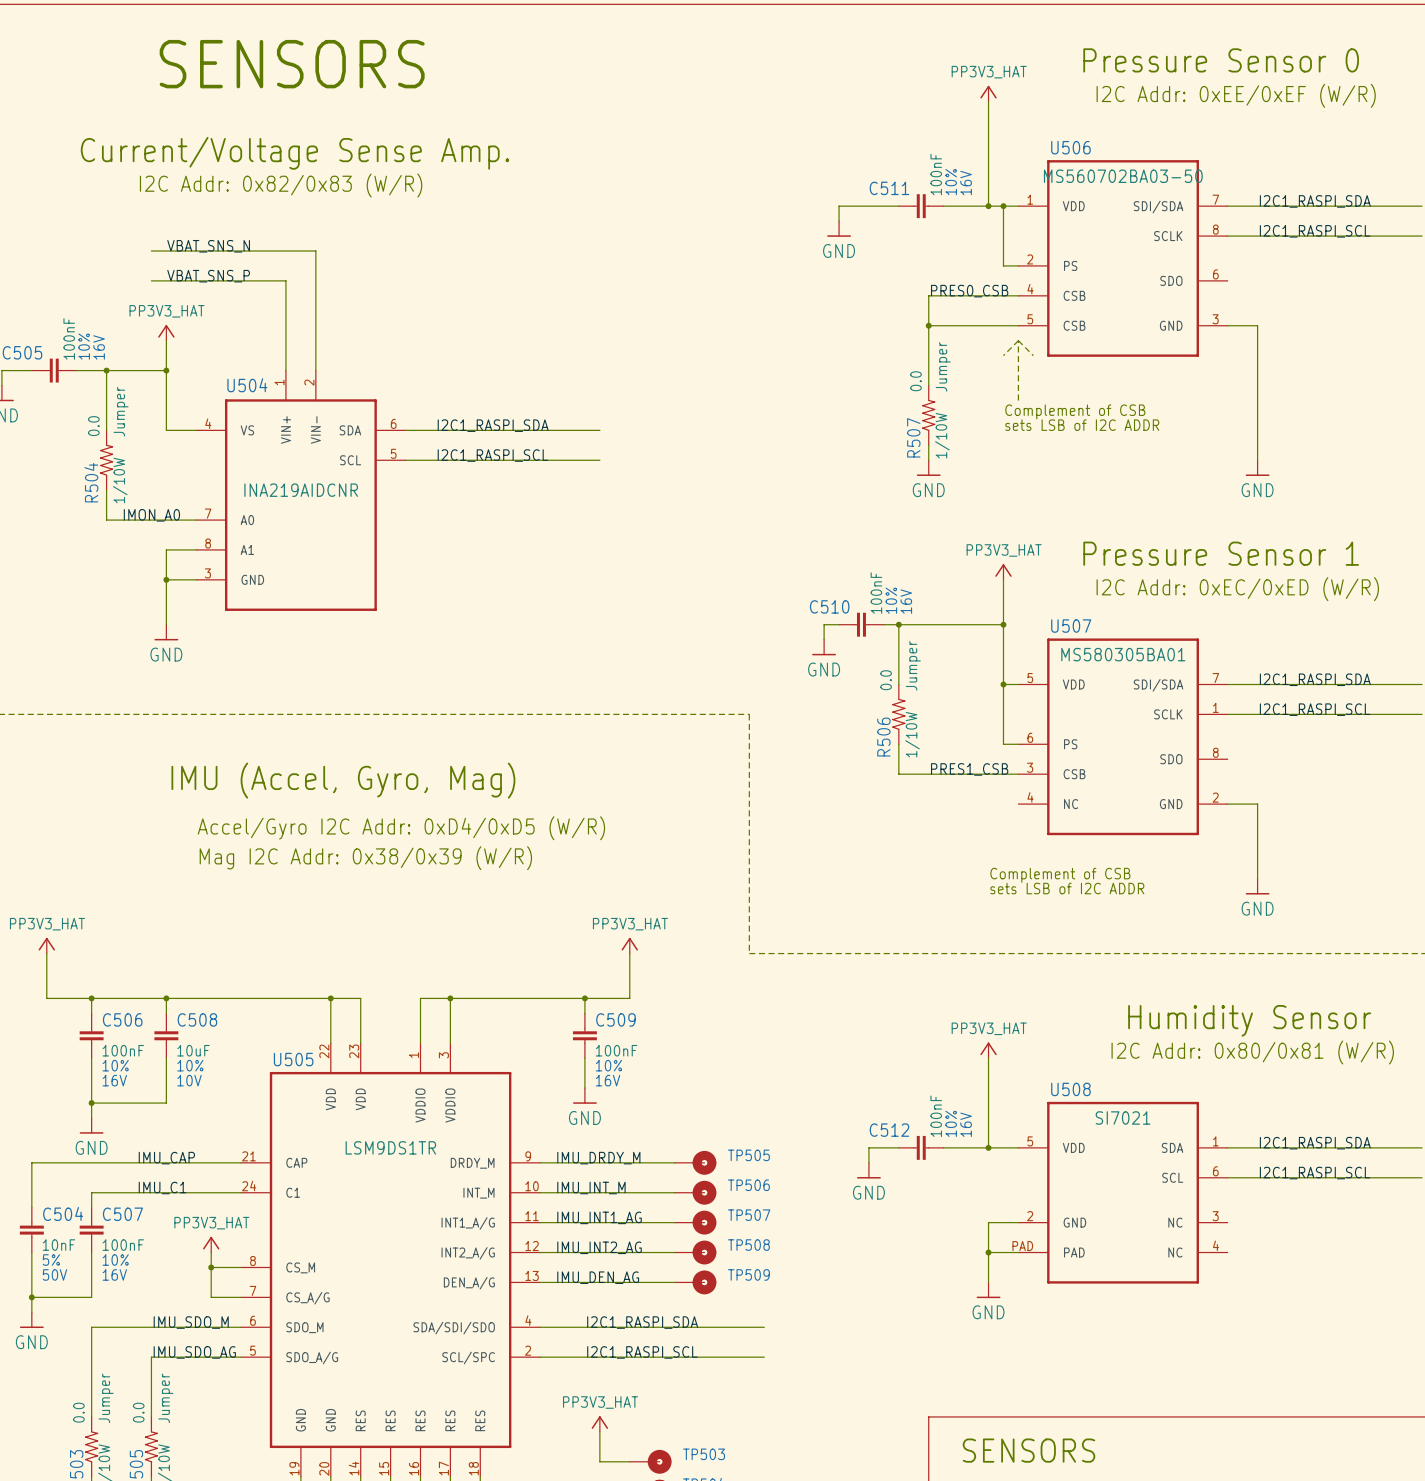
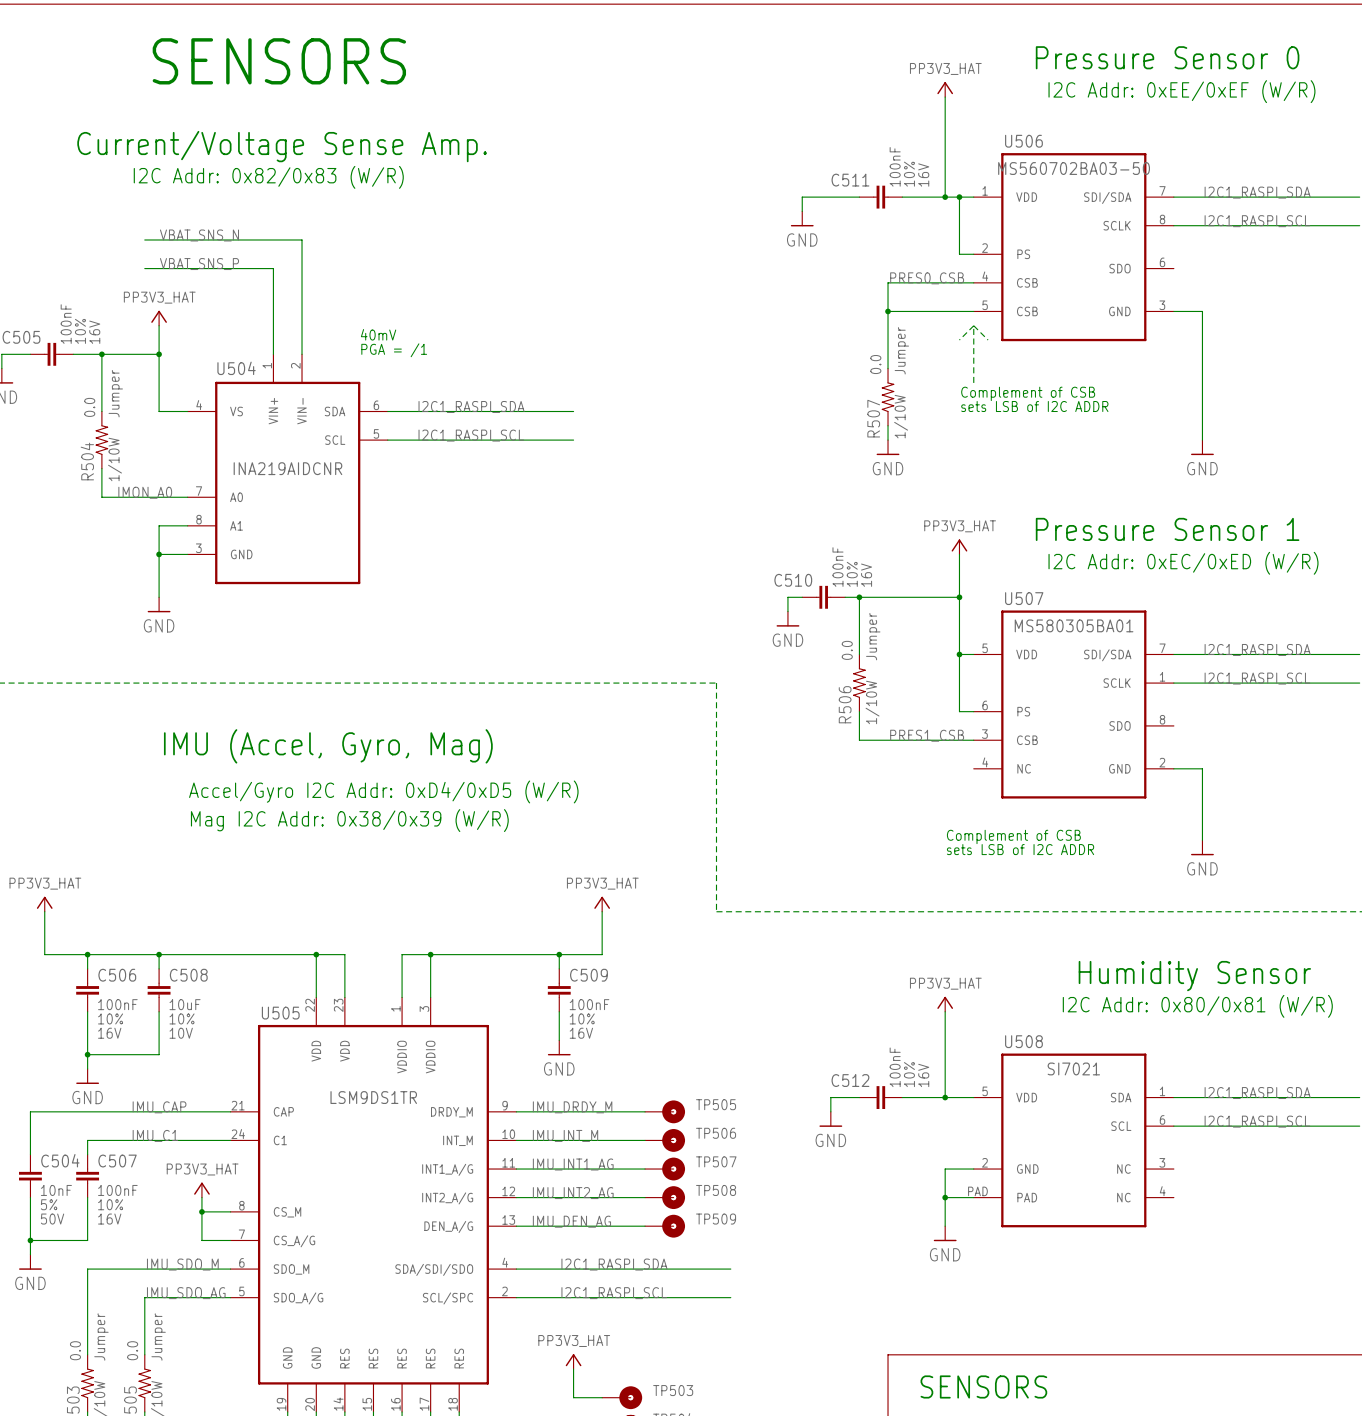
text: none -> 40mV (378, 334)
text: none -> PGA = /1 (394, 350)

